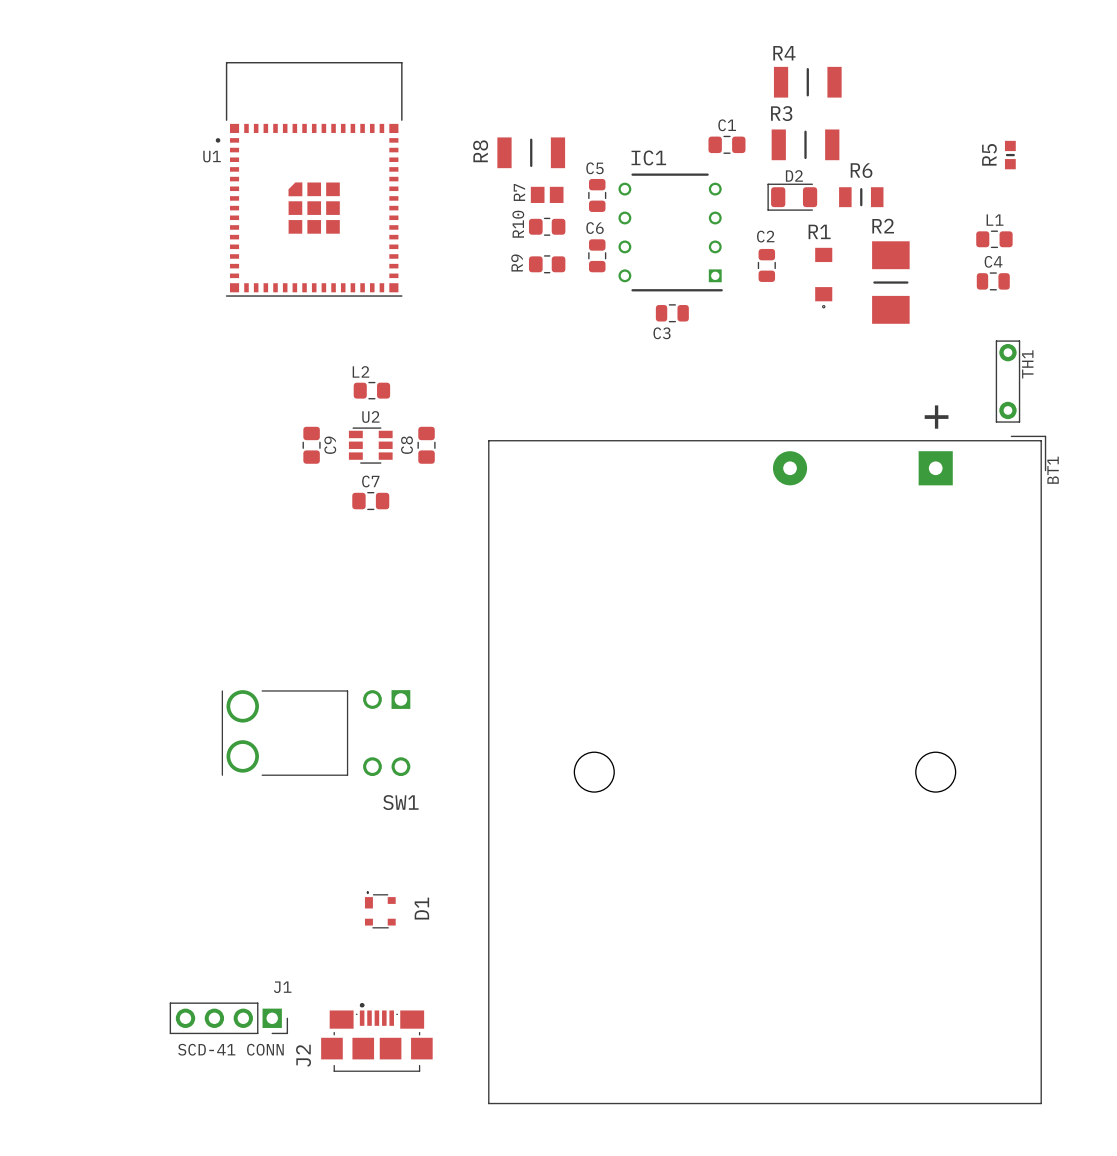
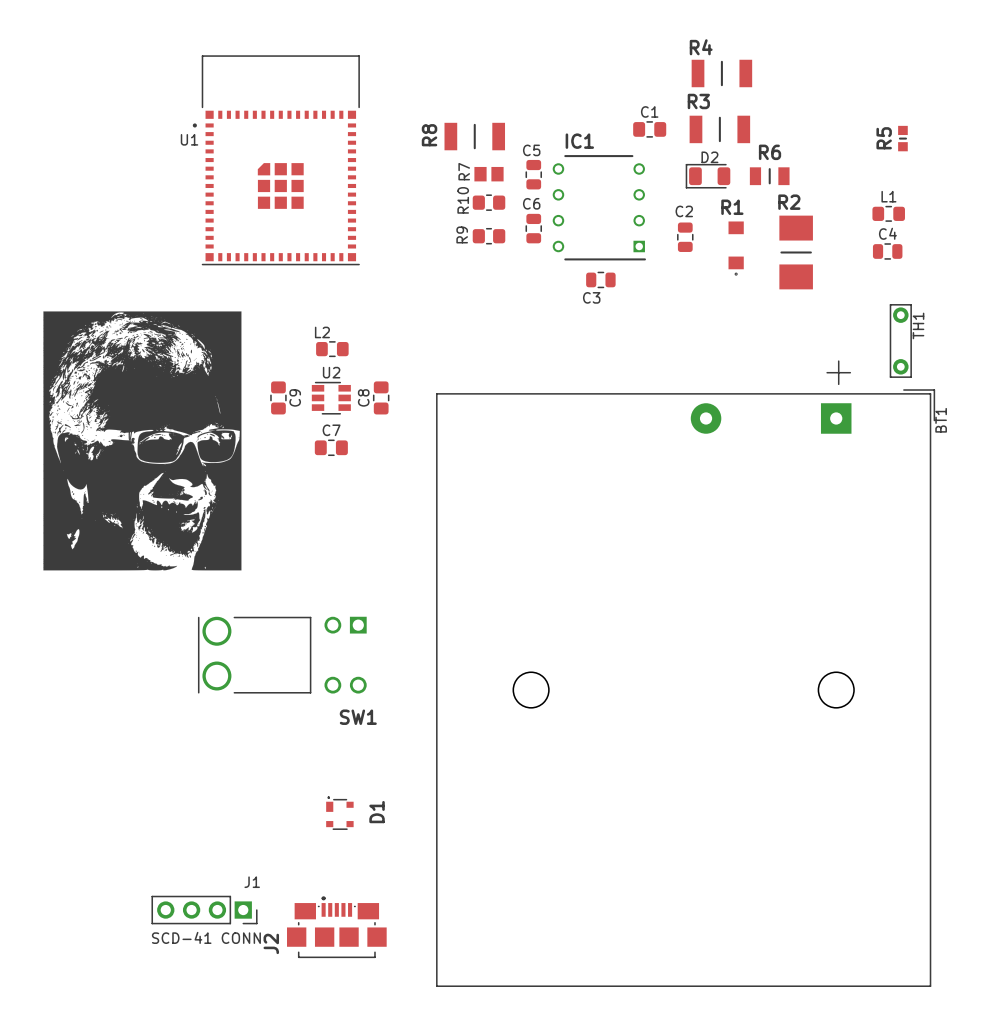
drawing: none -> [43, 311, 242, 571]

